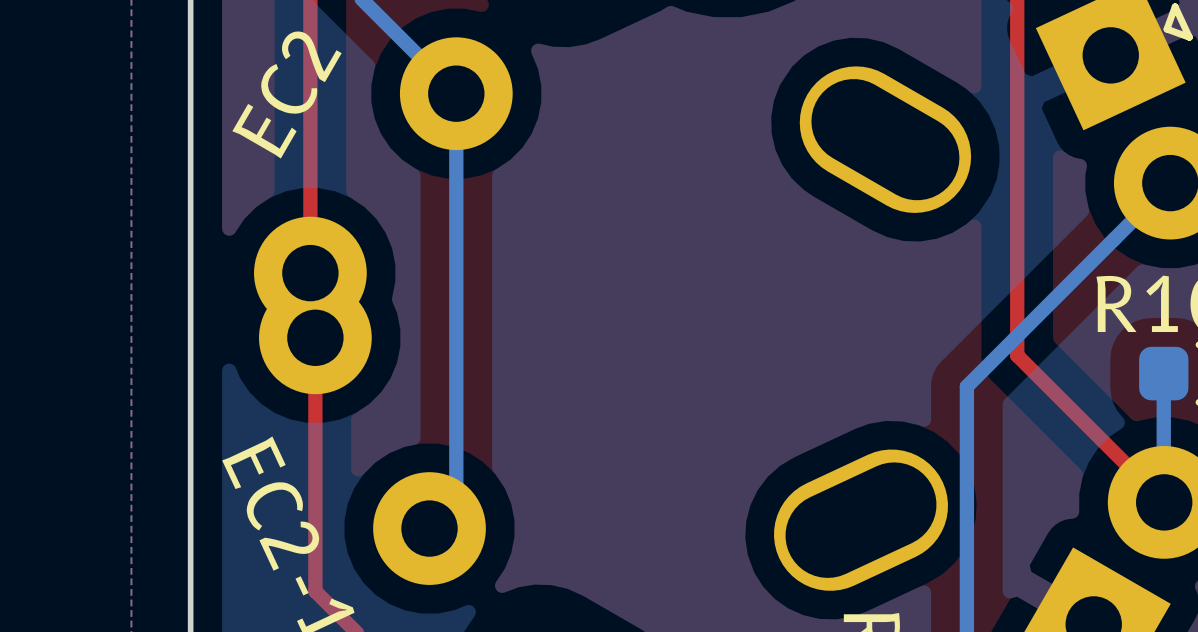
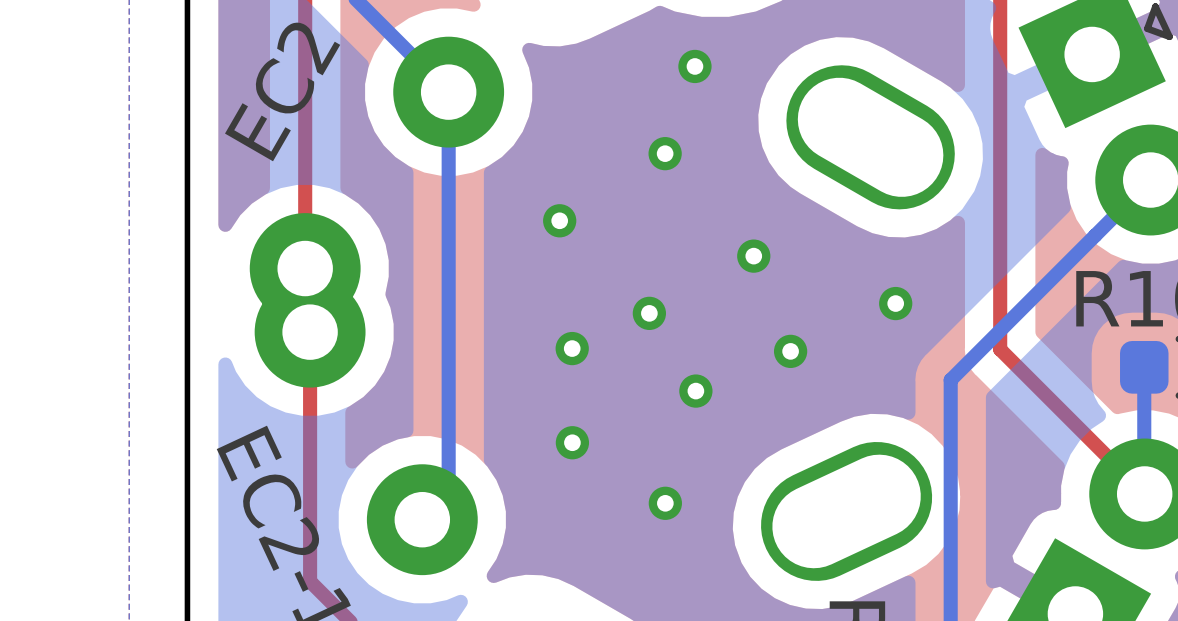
via: none -> (694, 66)
via: none -> (665, 153)
via: none -> (559, 220)
via: none -> (753, 256)
via: none -> (895, 303)
via: none -> (649, 313)
via: none -> (572, 348)
via: none -> (790, 351)
via: none -> (695, 391)
via: none -> (572, 442)
via: none -> (665, 503)

